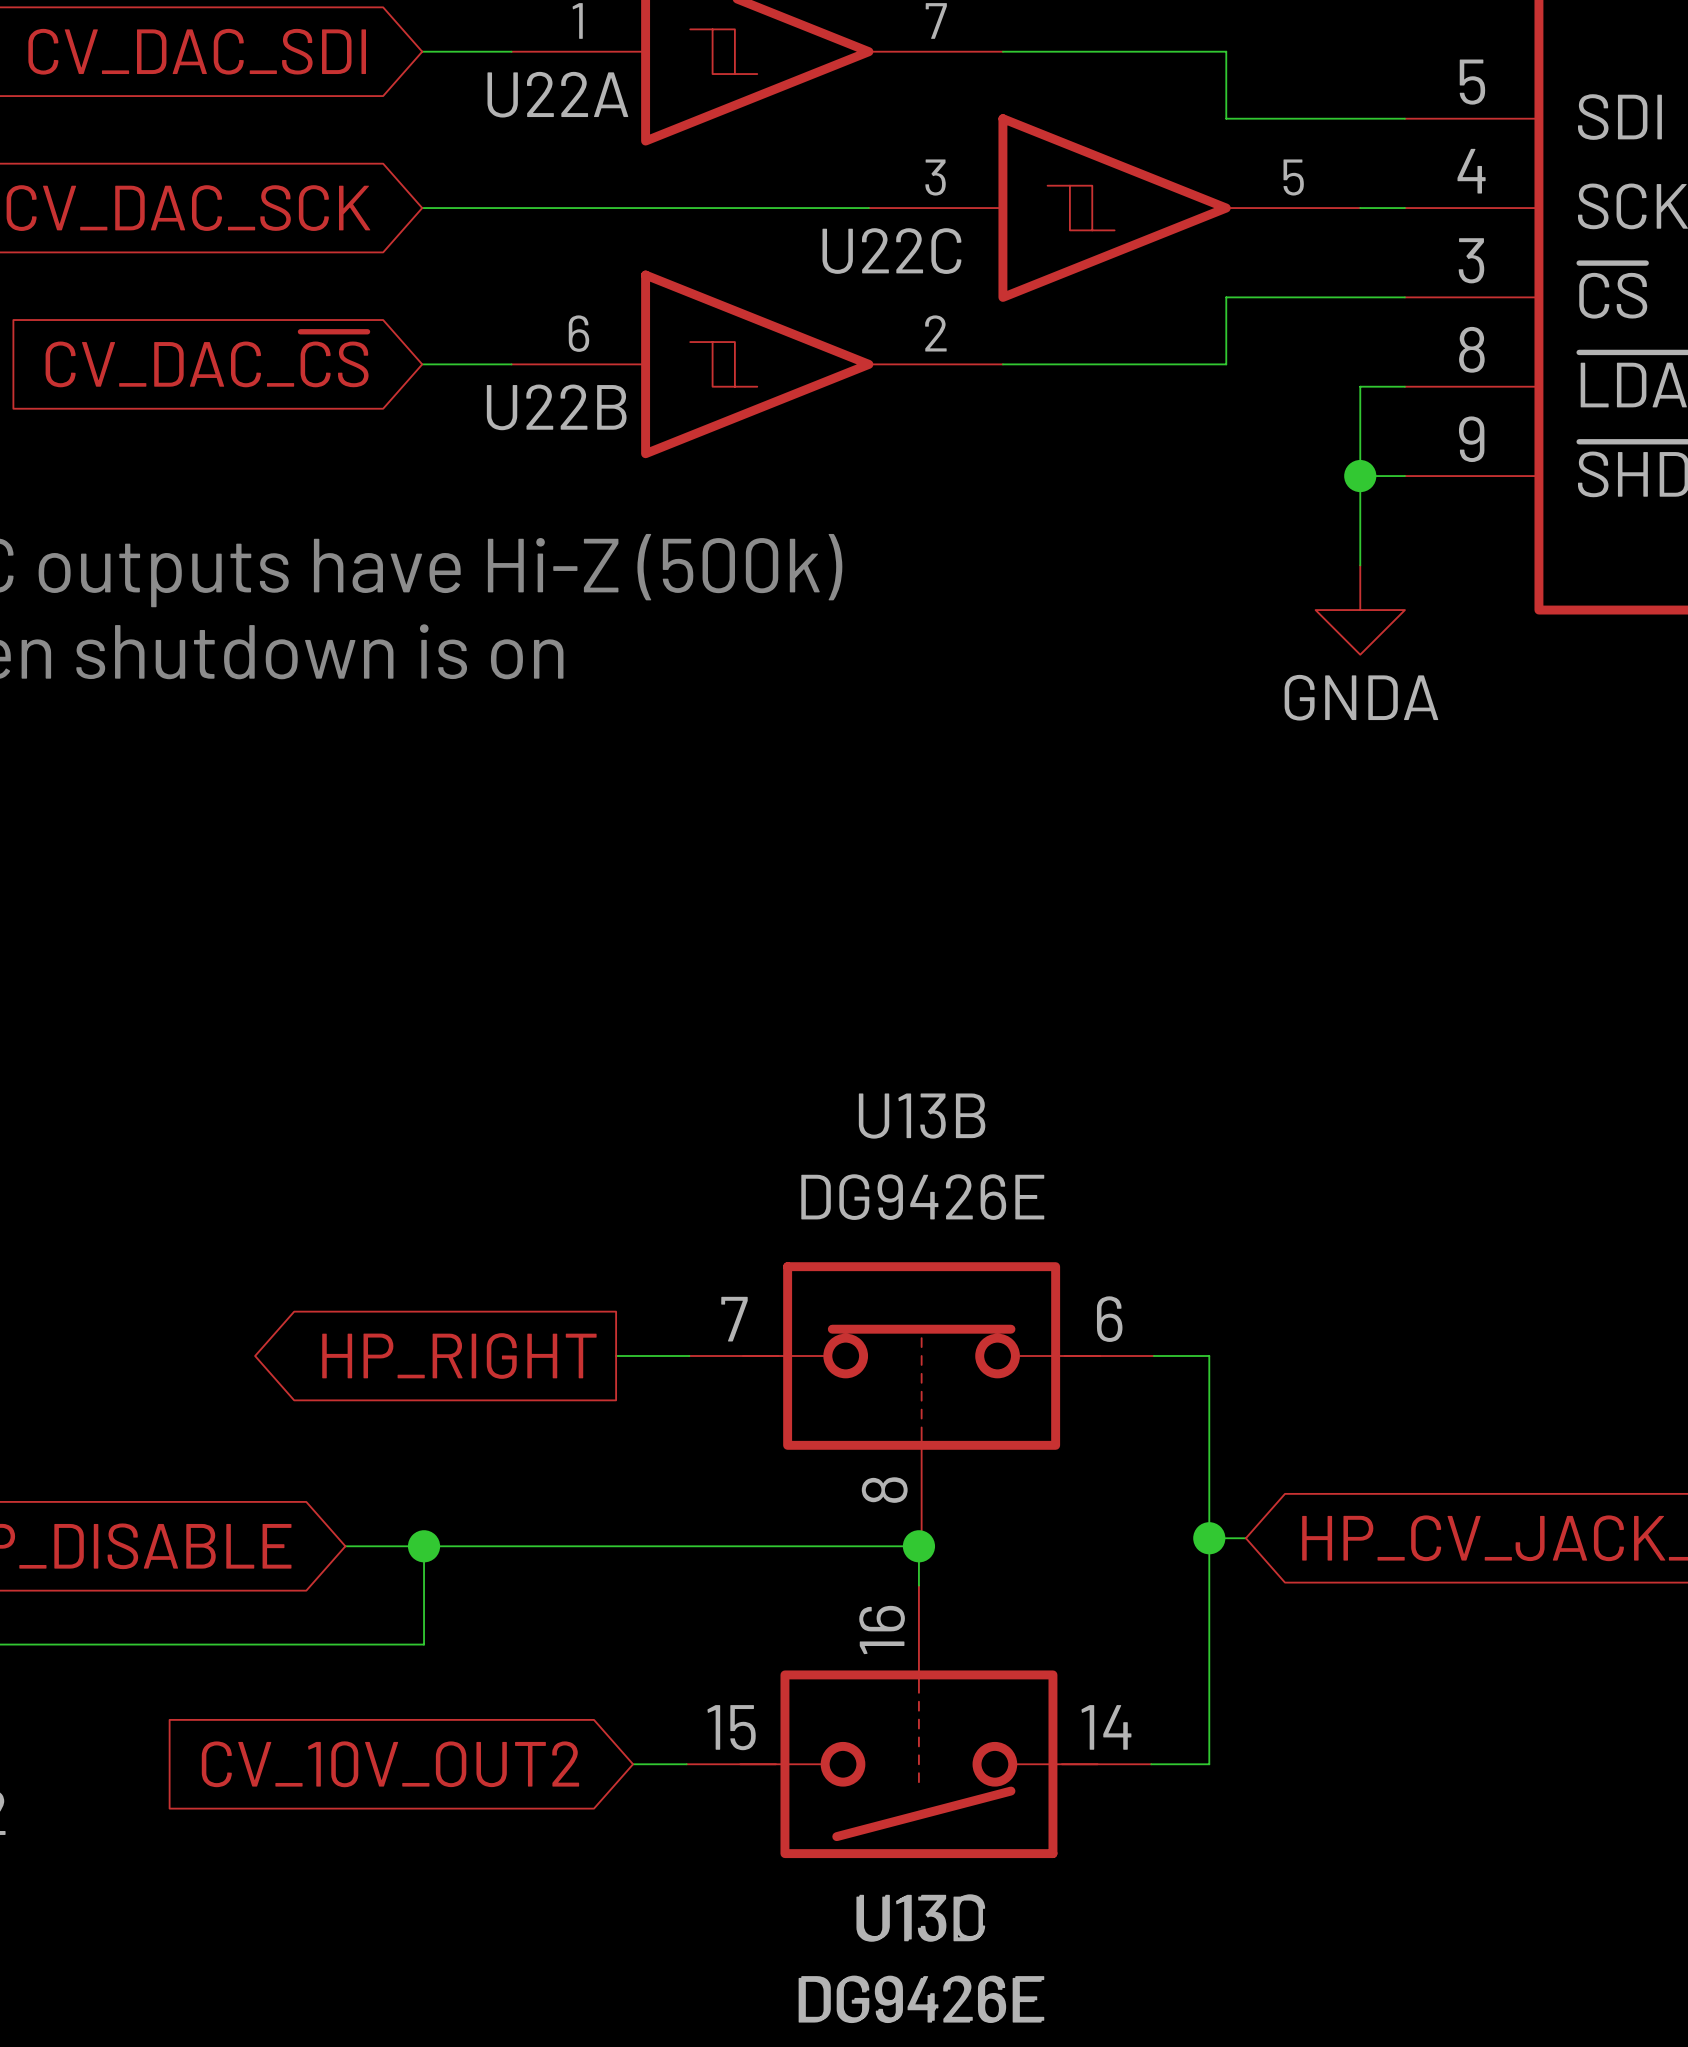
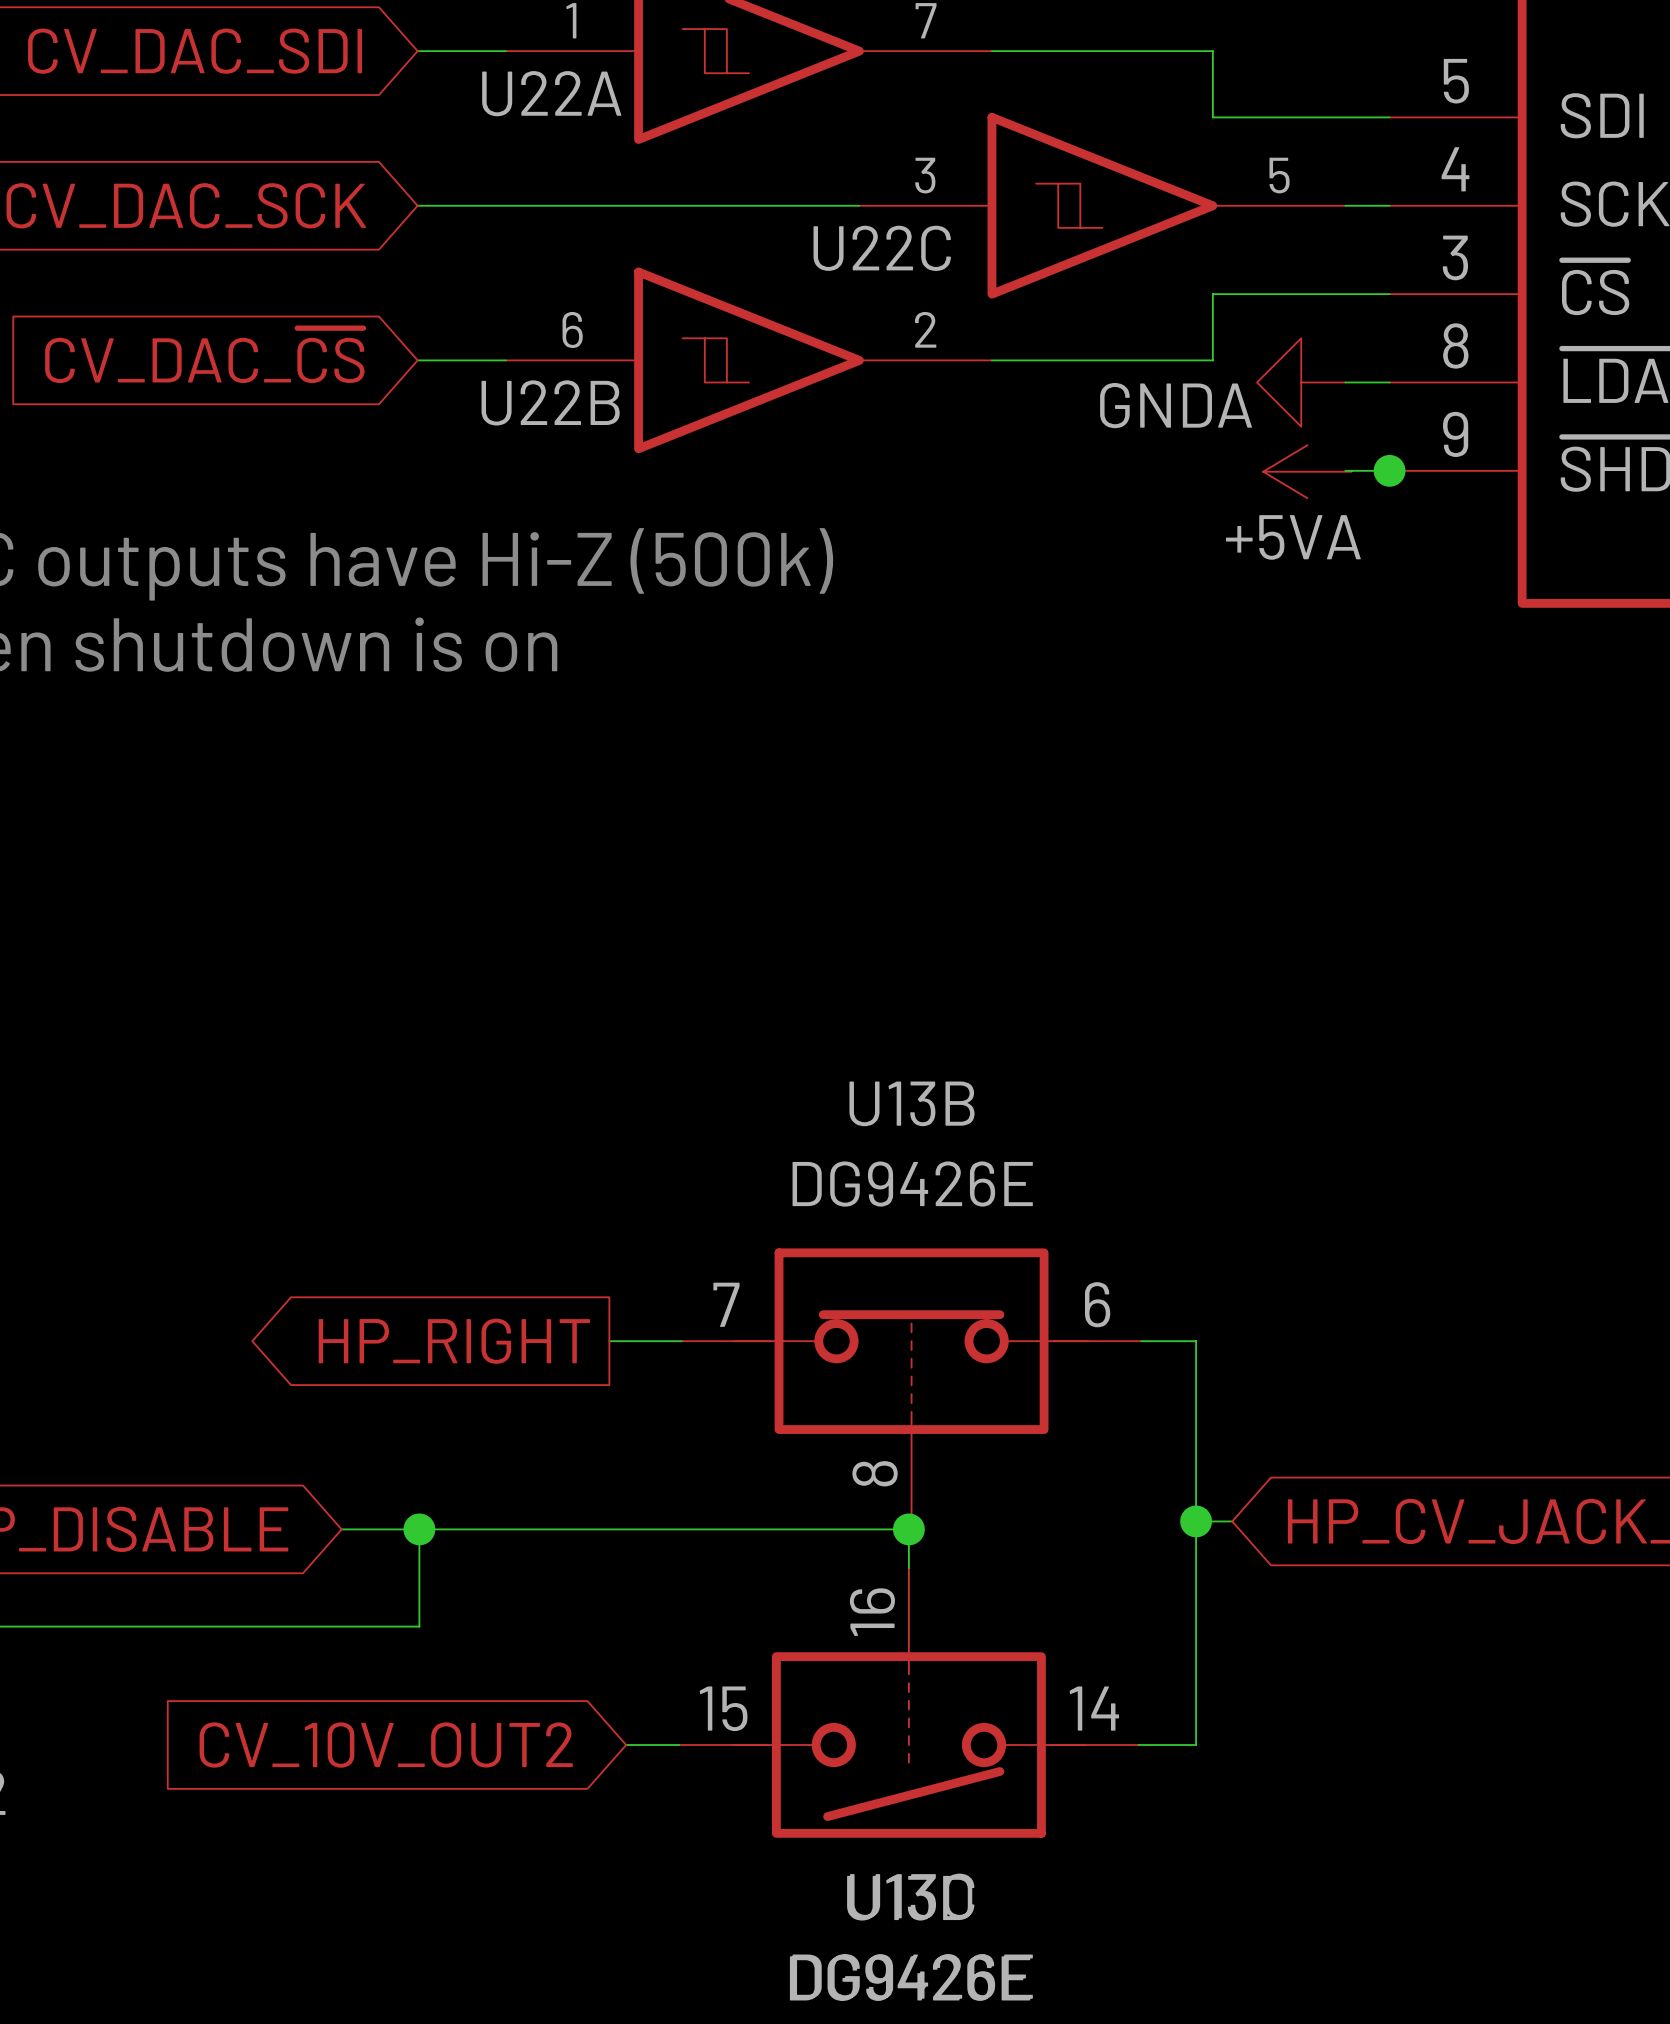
wire: (1360, 386) (1360, 565) -> none
power symbol: none -> +5VA (1307, 471)
junction position: (1360, 476) -> (1389, 470)
power symbol rotation: 0° (1360, 610) -> 90° clockwise (1301, 382)
power symbol position: GNDA (1360, 610) -> GNDA (1301, 382)

